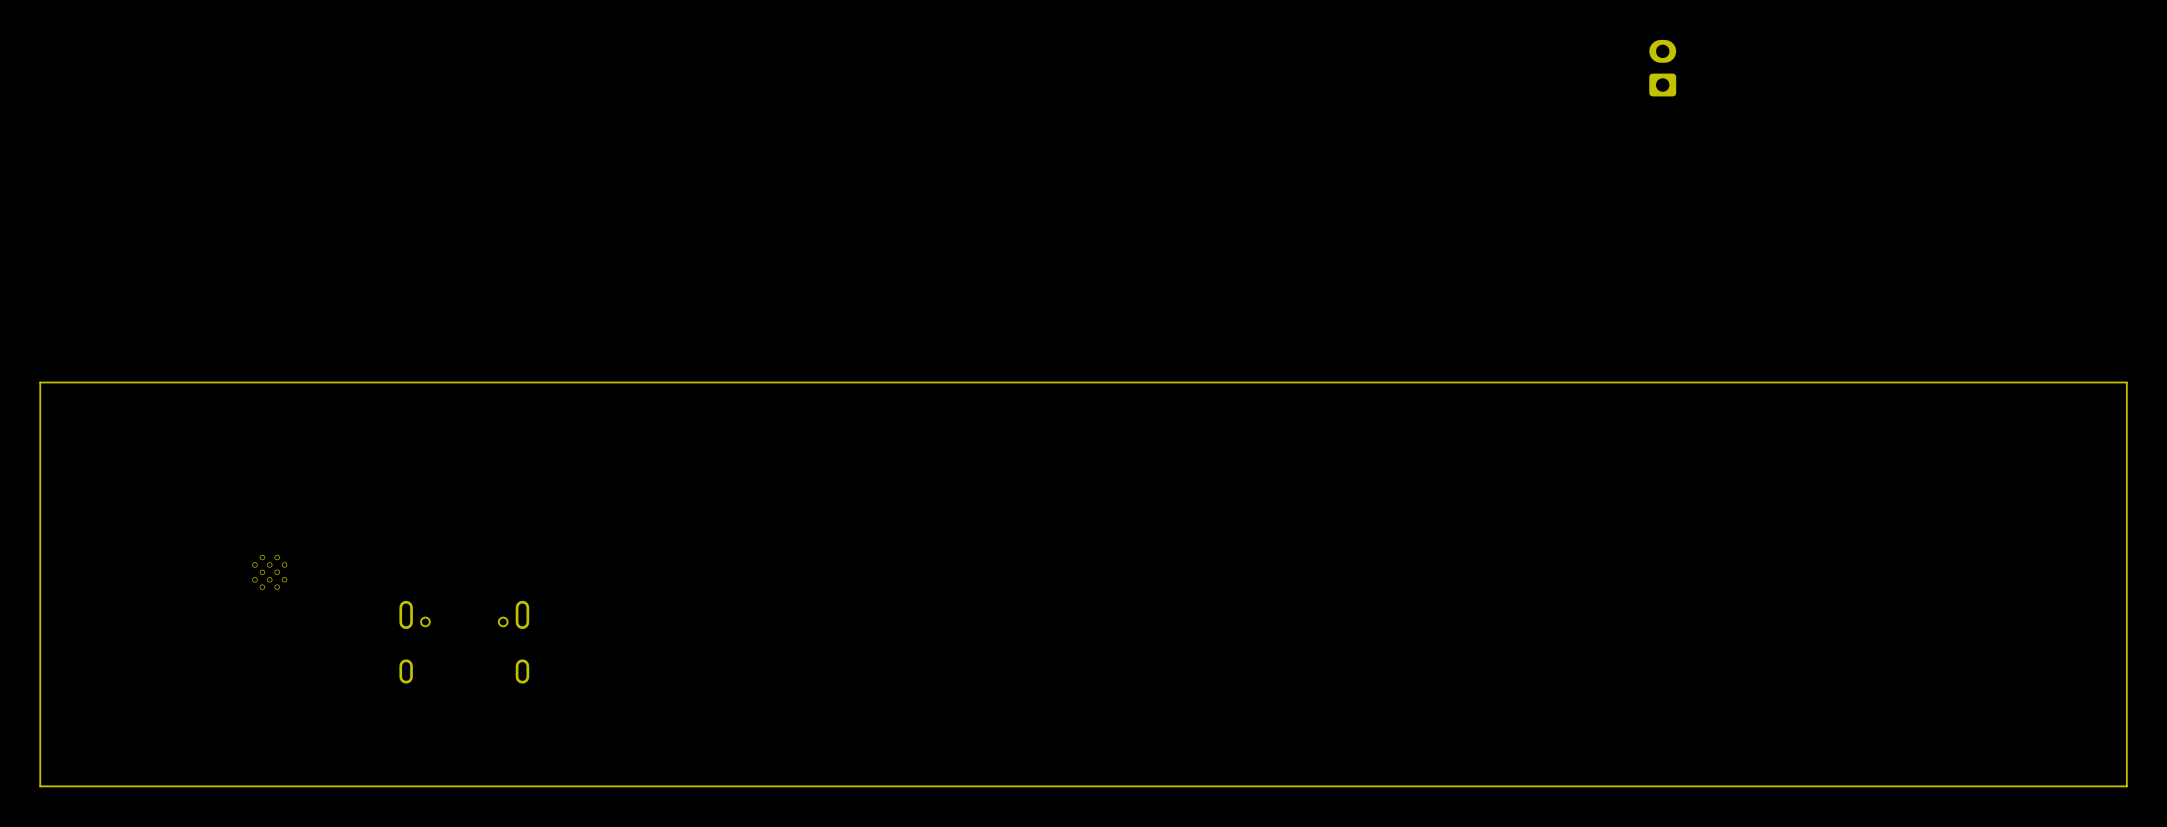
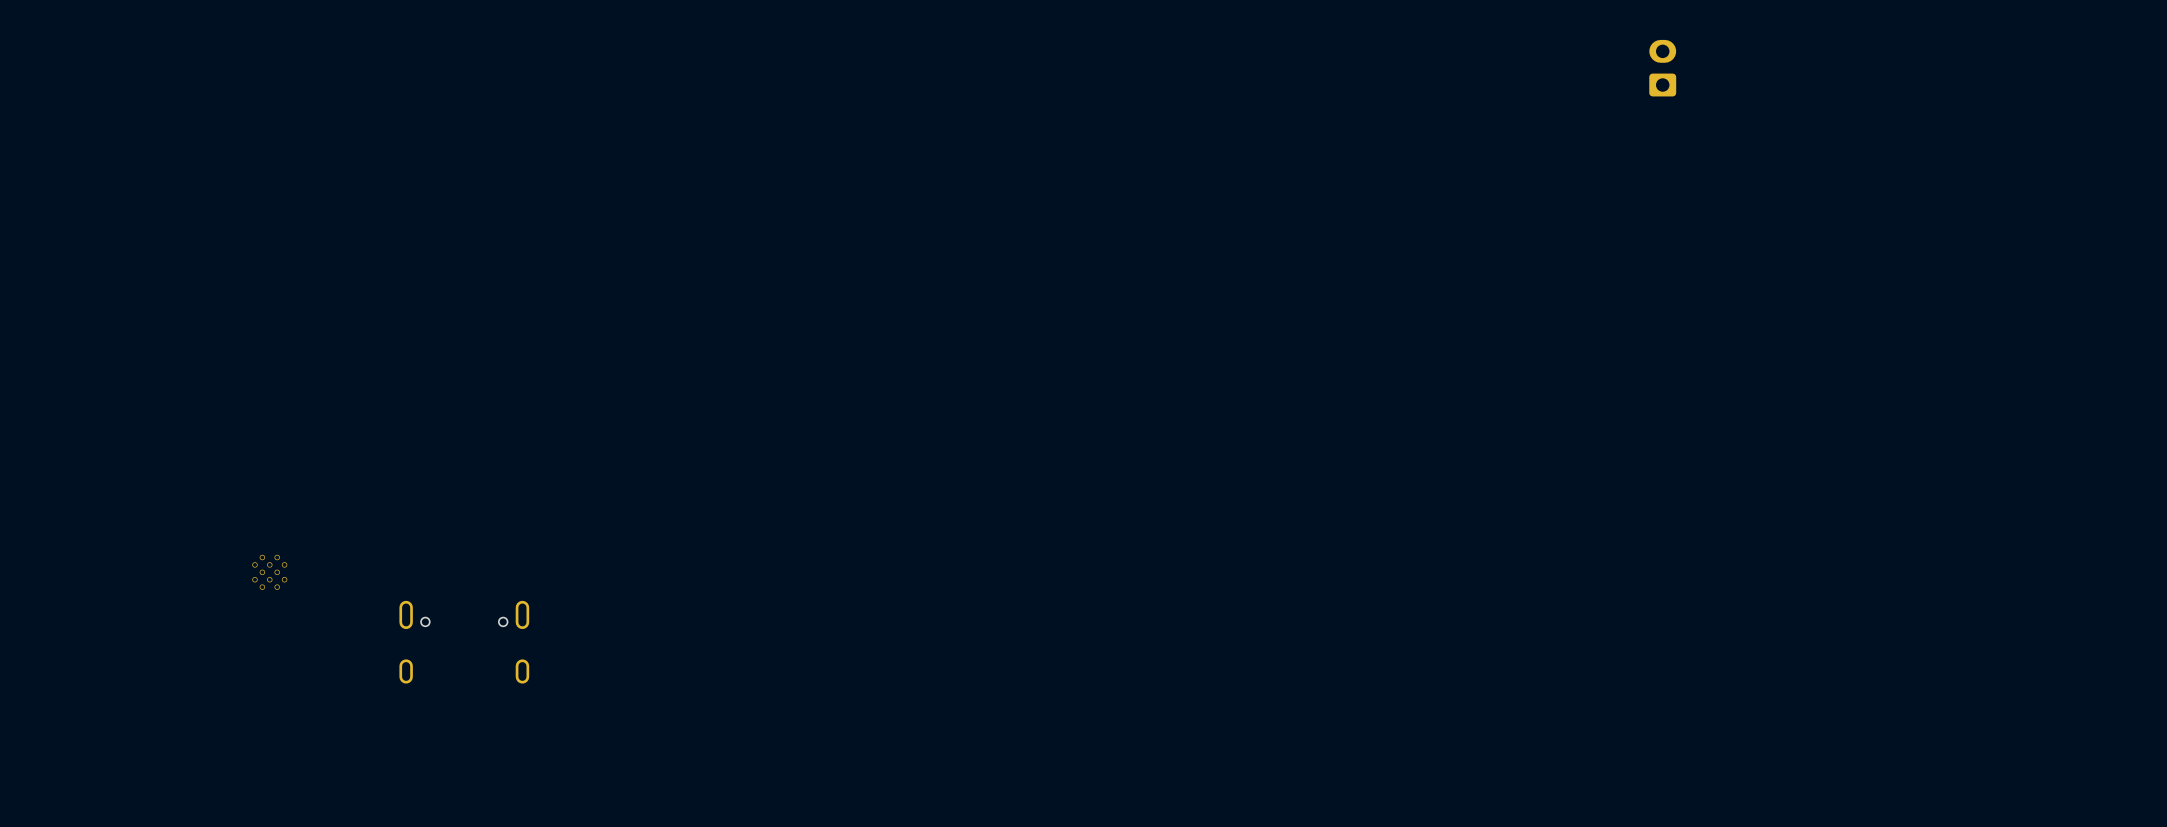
board edge: (2126, 382) (40, 382) (40, 786) (2126, 786) (2126, 382) -> none

